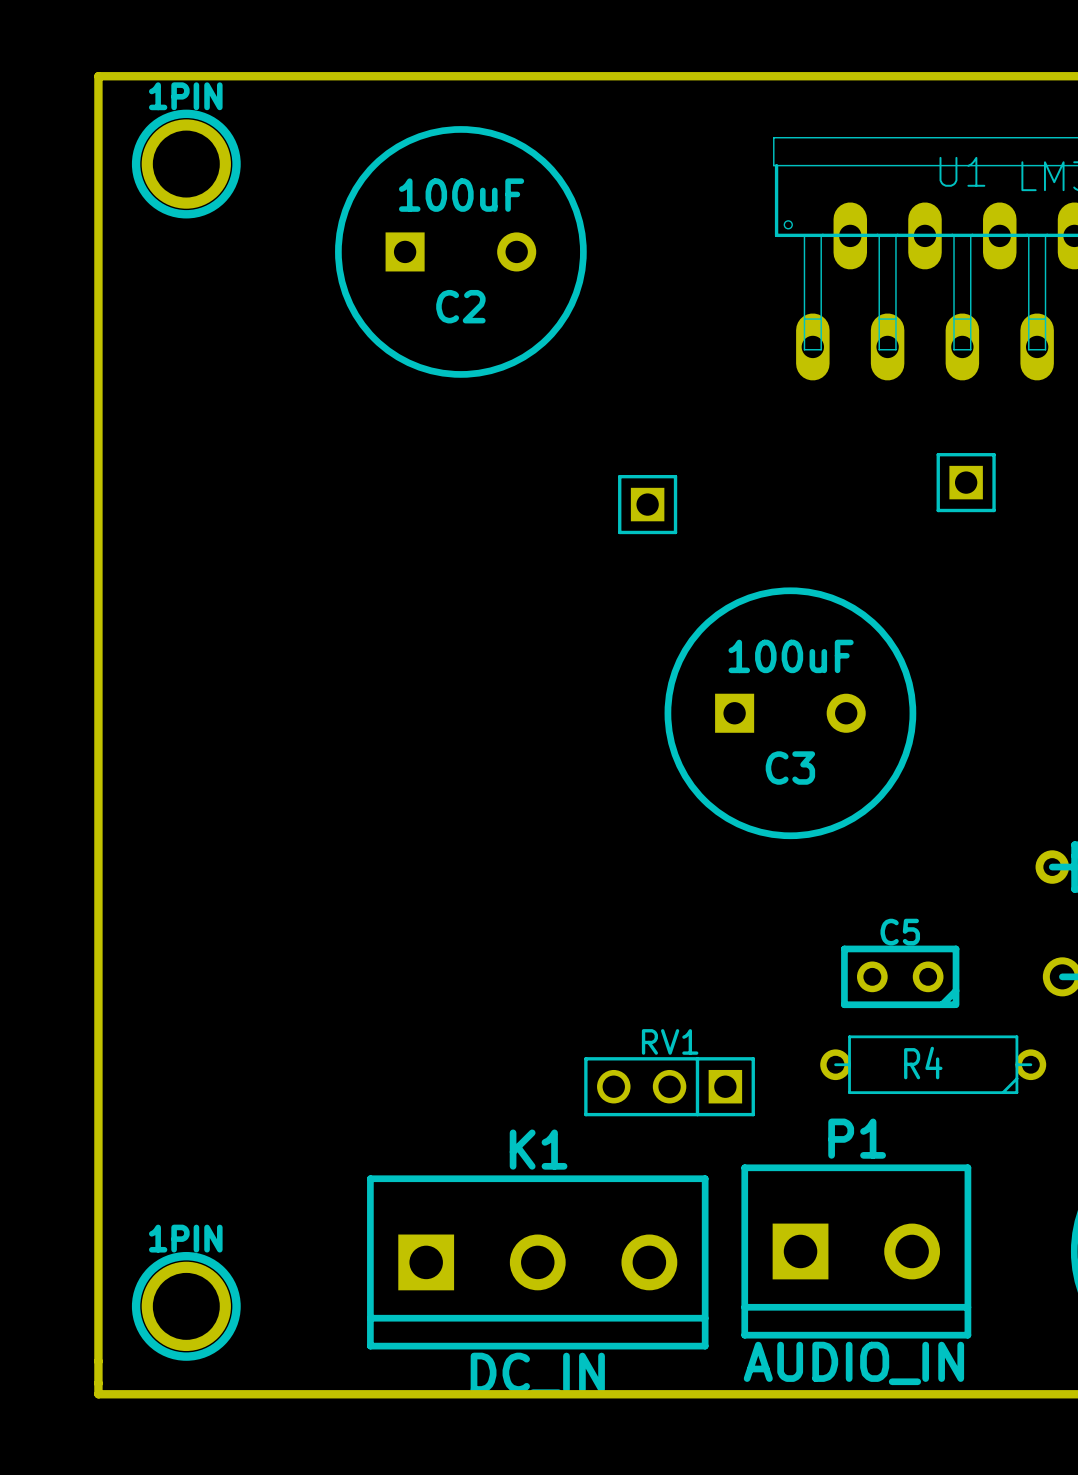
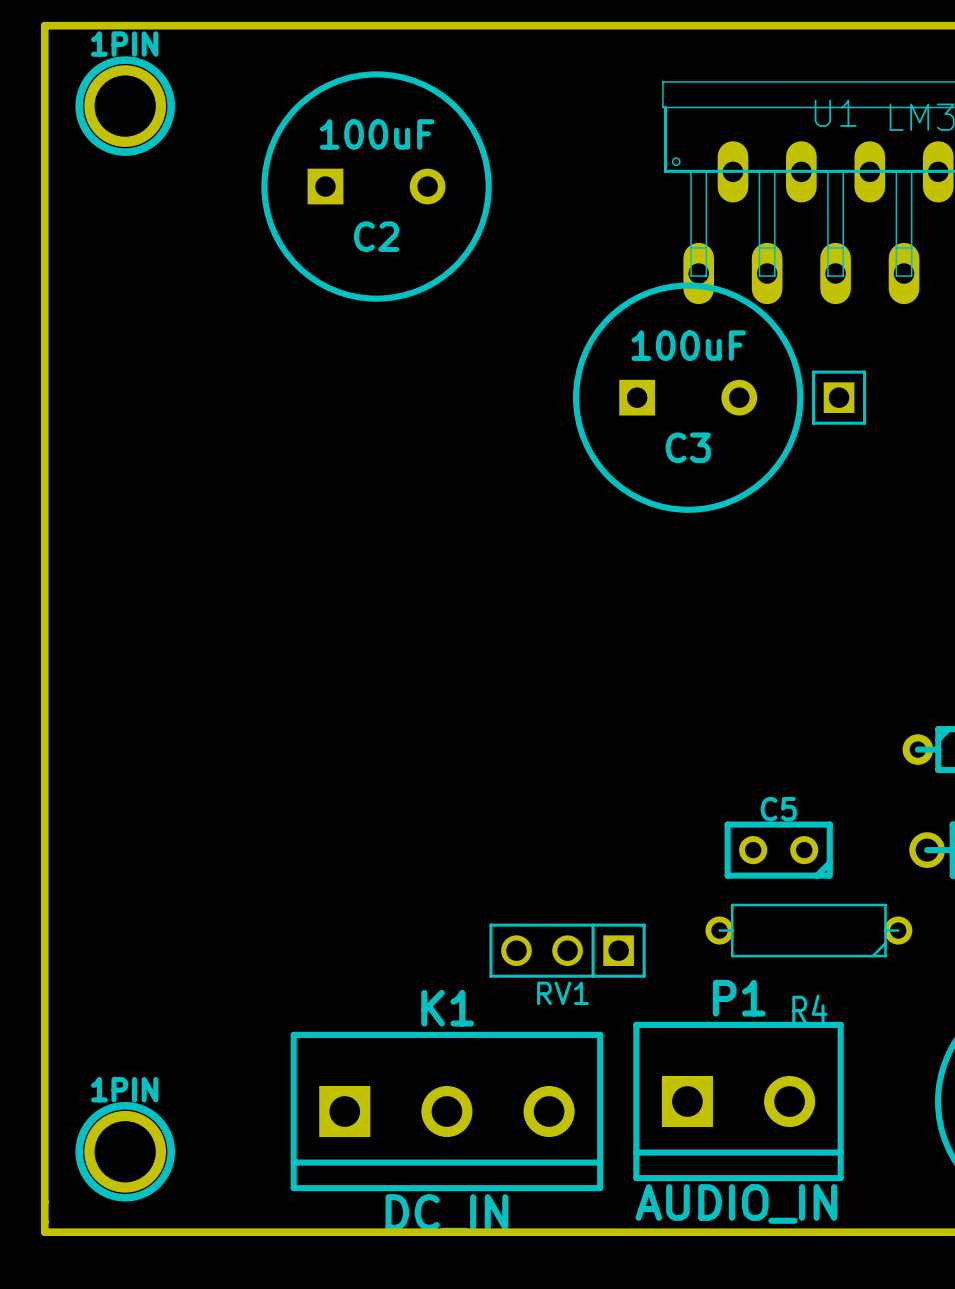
part: (647, 504) -> none
C3 position: (790, 713) -> (688, 397)
RV1 name position: RV1 (670, 1041) -> RV1 (562, 993)
R4 name position: R4 (923, 1063) -> R4 (809, 1009)

